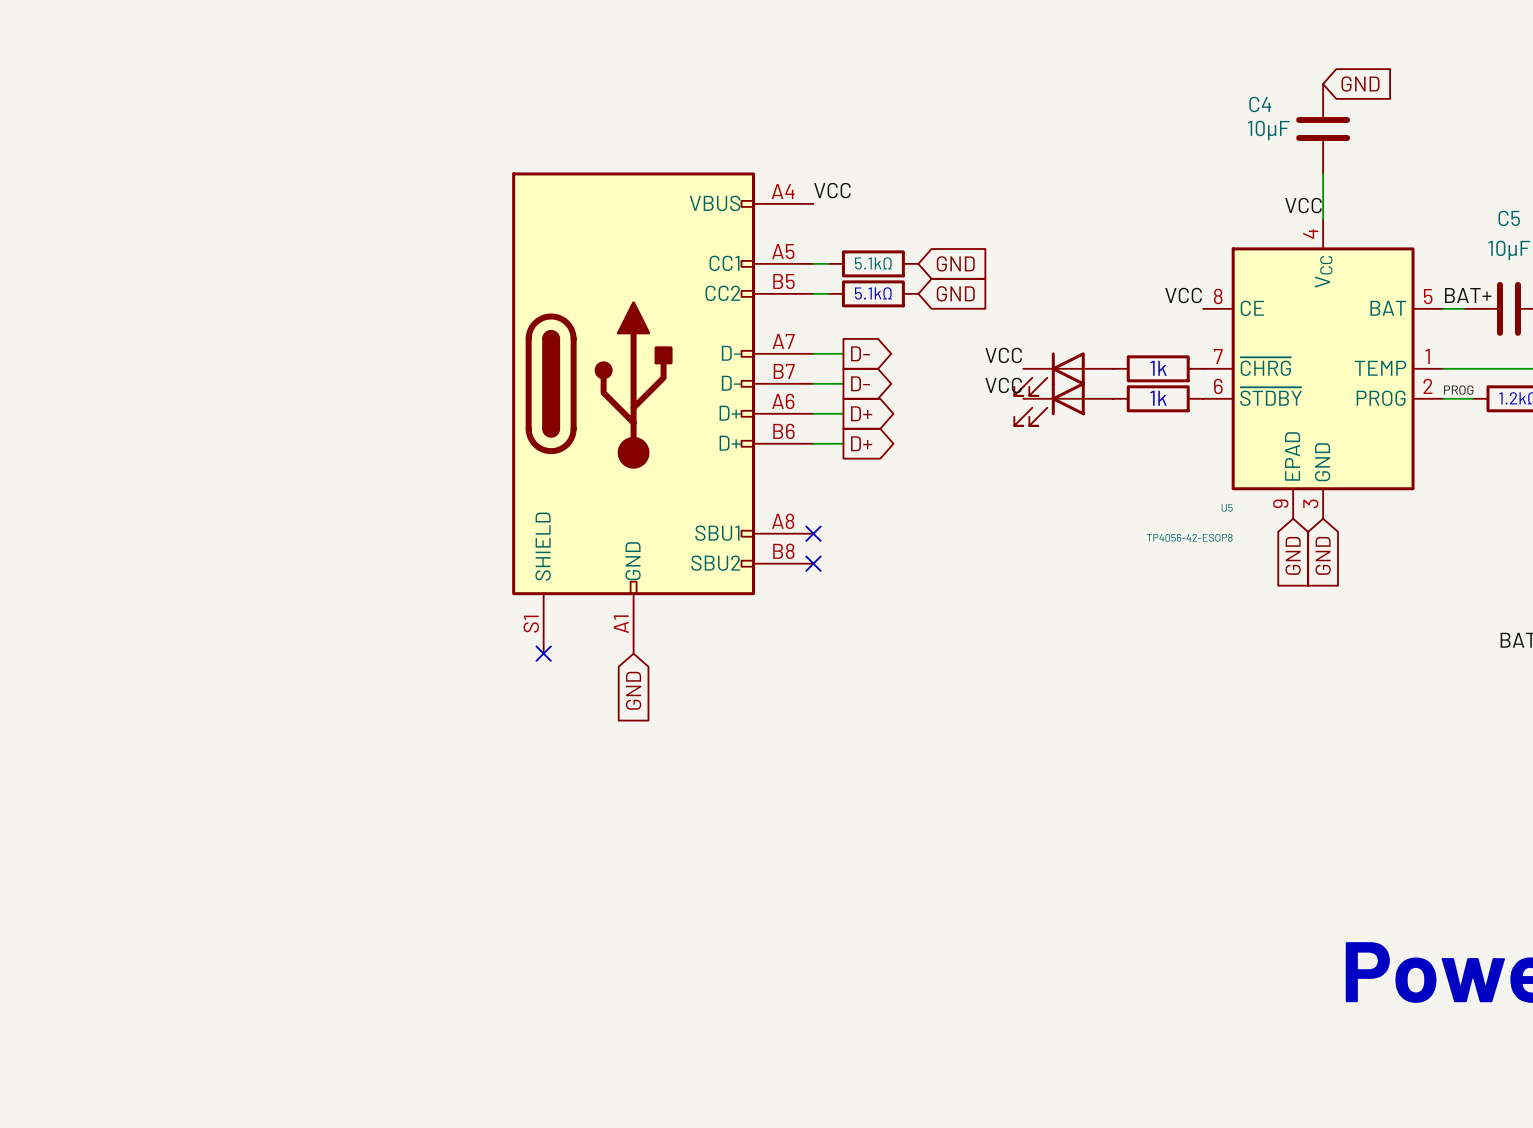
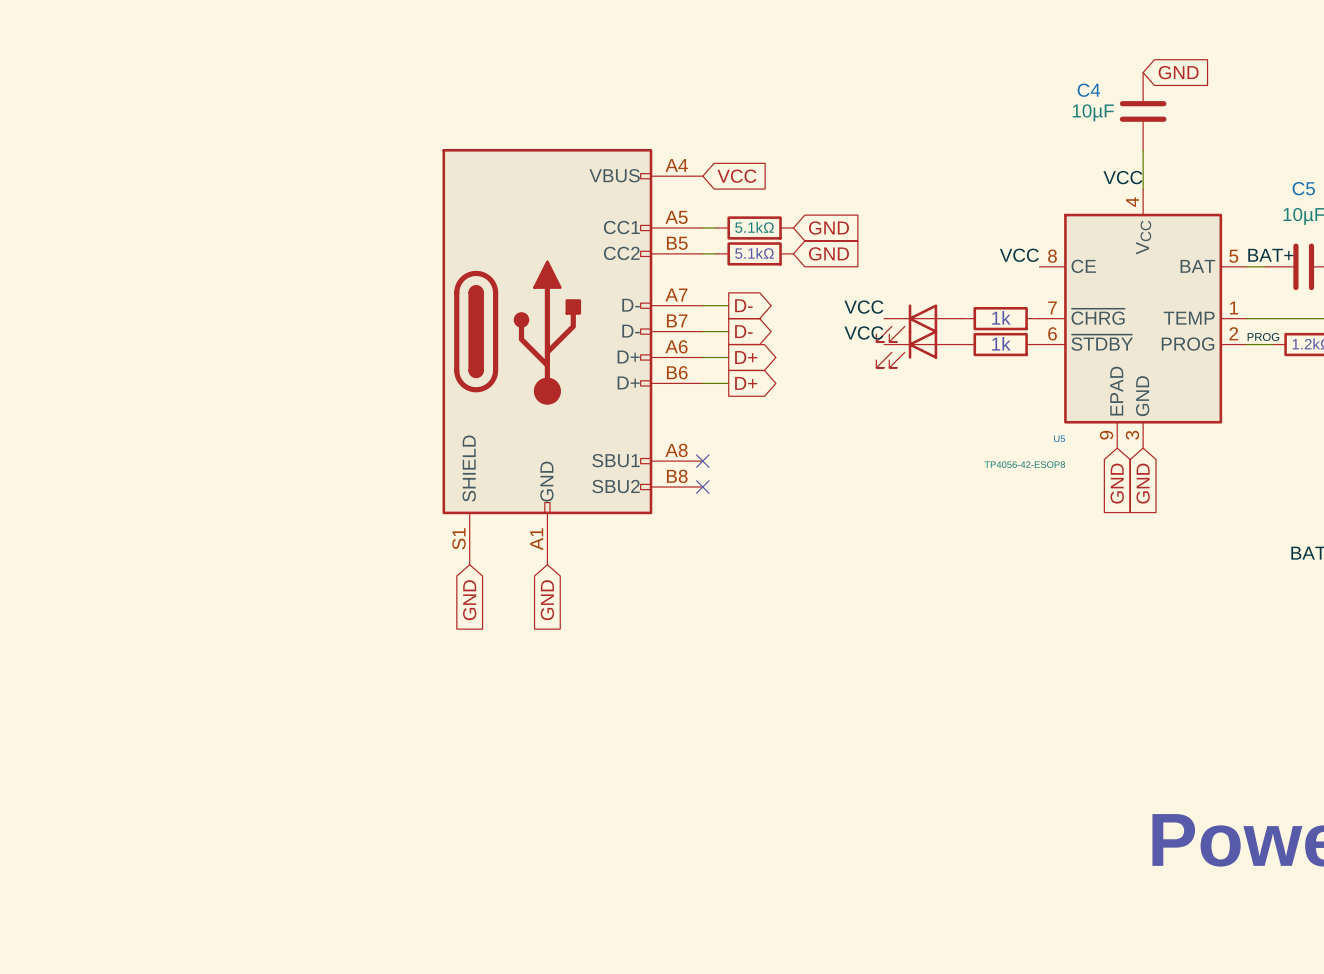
label: VCC (832, 190) -> none
global label: none -> VCC (736, 176)
no-connect mark: (543, 653) -> none
global label: none -> GND (469, 600)

